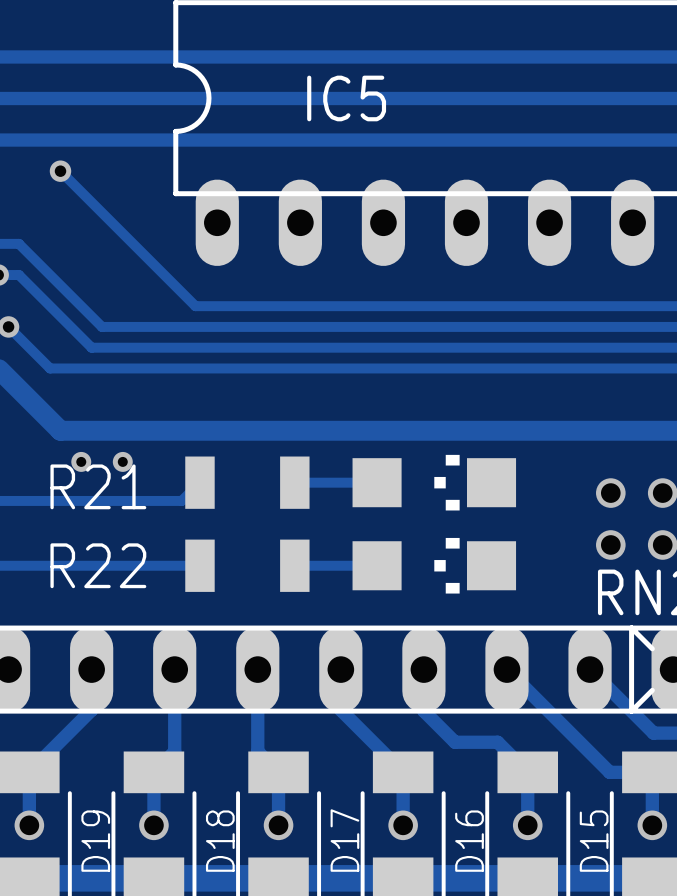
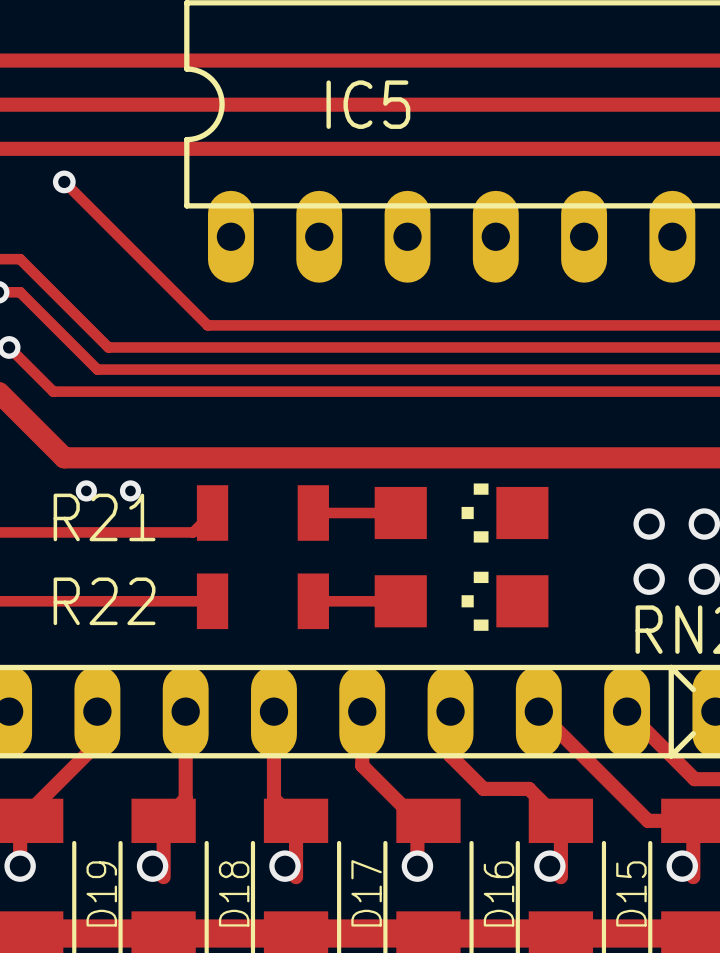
track: (91, 699) (91, 710) (29, 772) (29, 825) -> (97, 743) (20, 820) (20, 866)
track: (340, 710) (403, 772) (403, 825) -> (362, 754) (362, 765) (417, 820) (417, 866)
via position: (29, 825) -> (20, 866)
via position: (153, 825) -> (152, 866)
via position: (278, 825) -> (285, 866)
via position: (403, 825) -> (417, 866)
via position: (527, 825) -> (549, 866)
via position: (652, 825) -> (682, 866)

